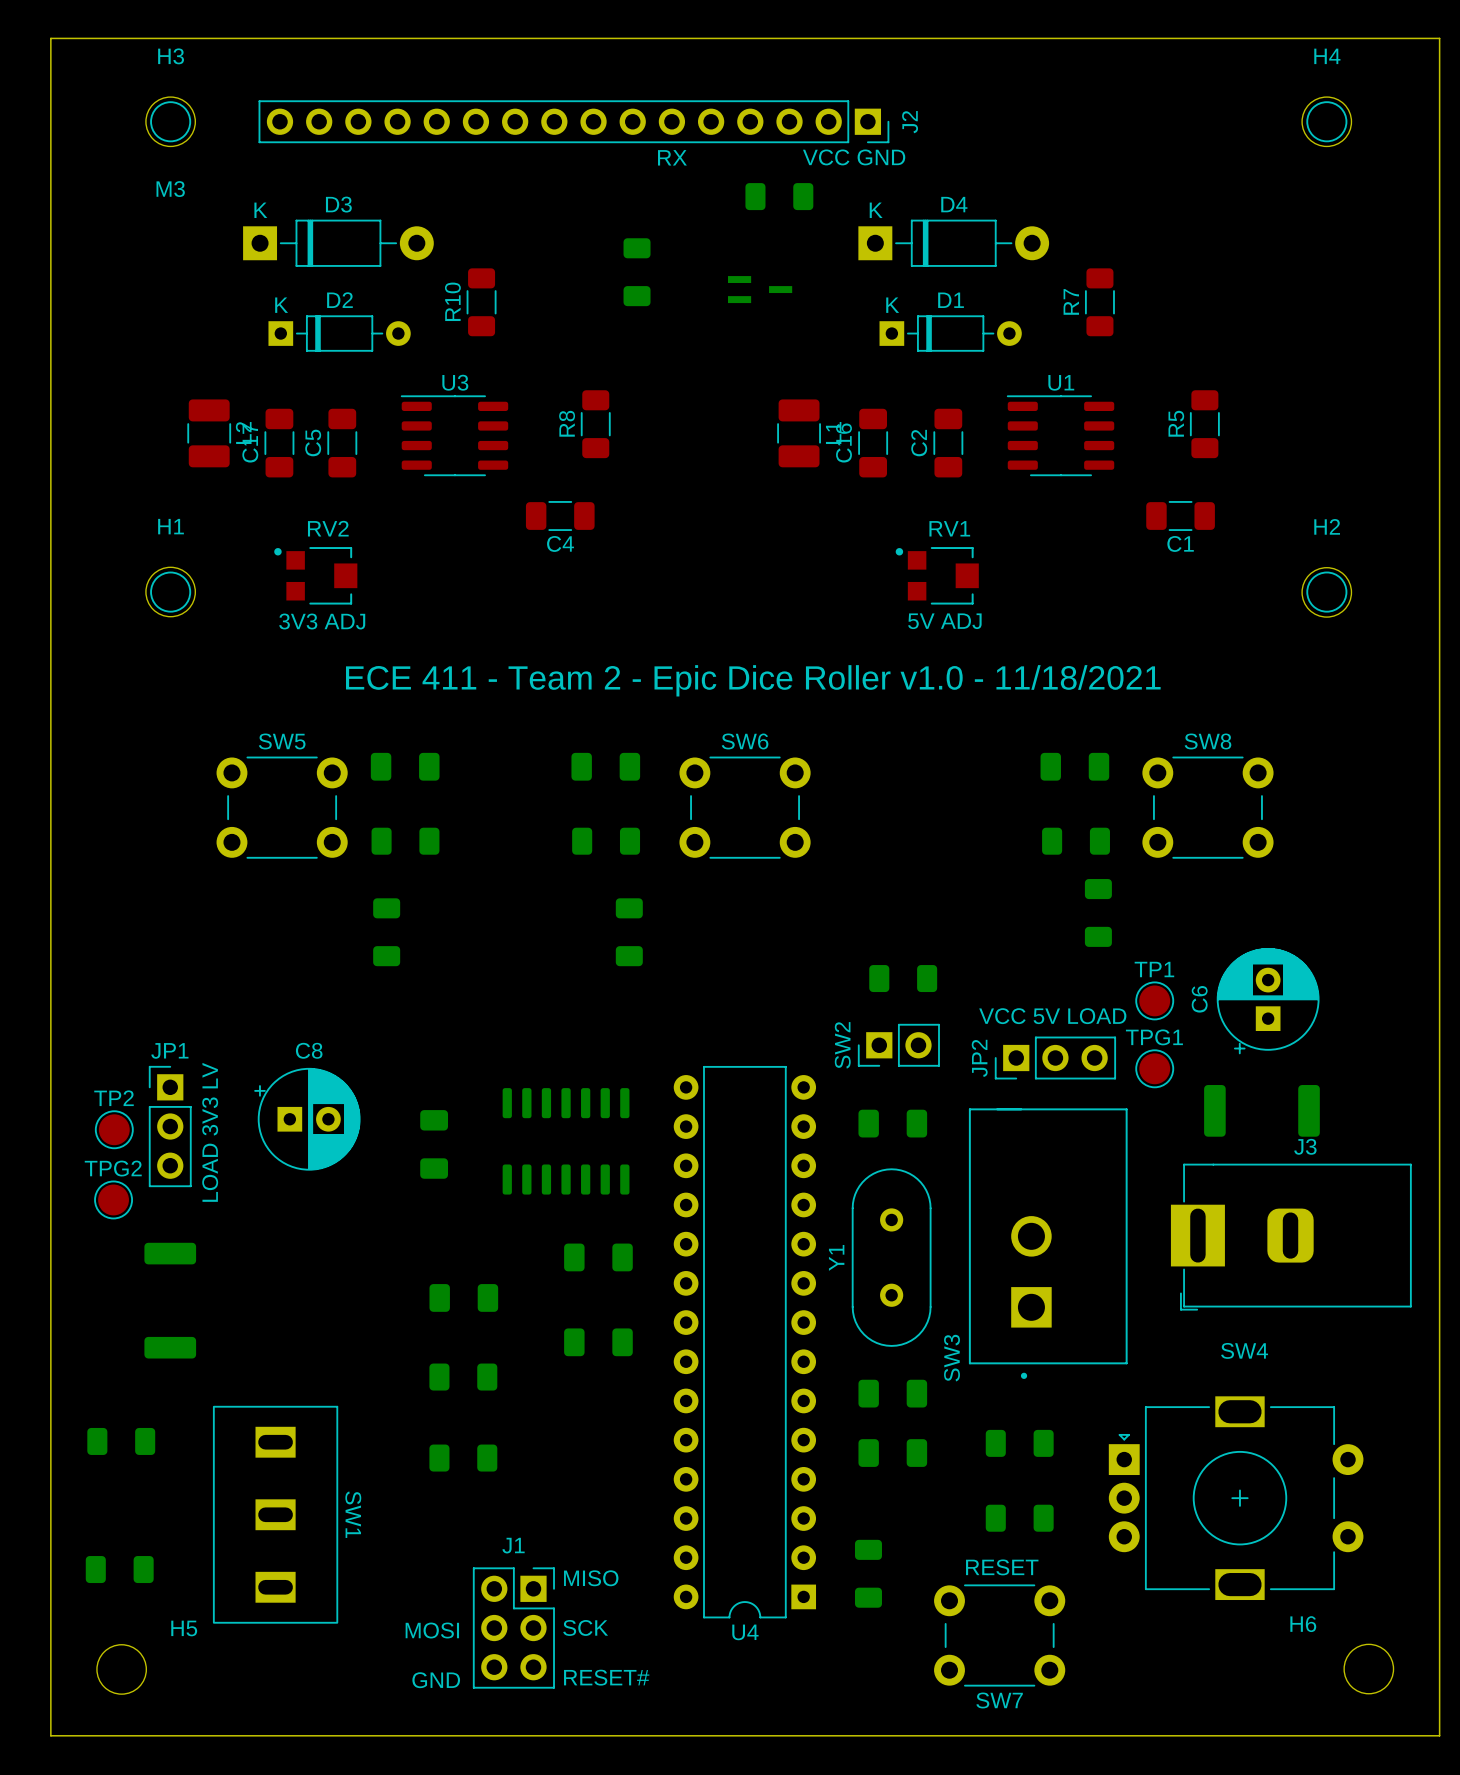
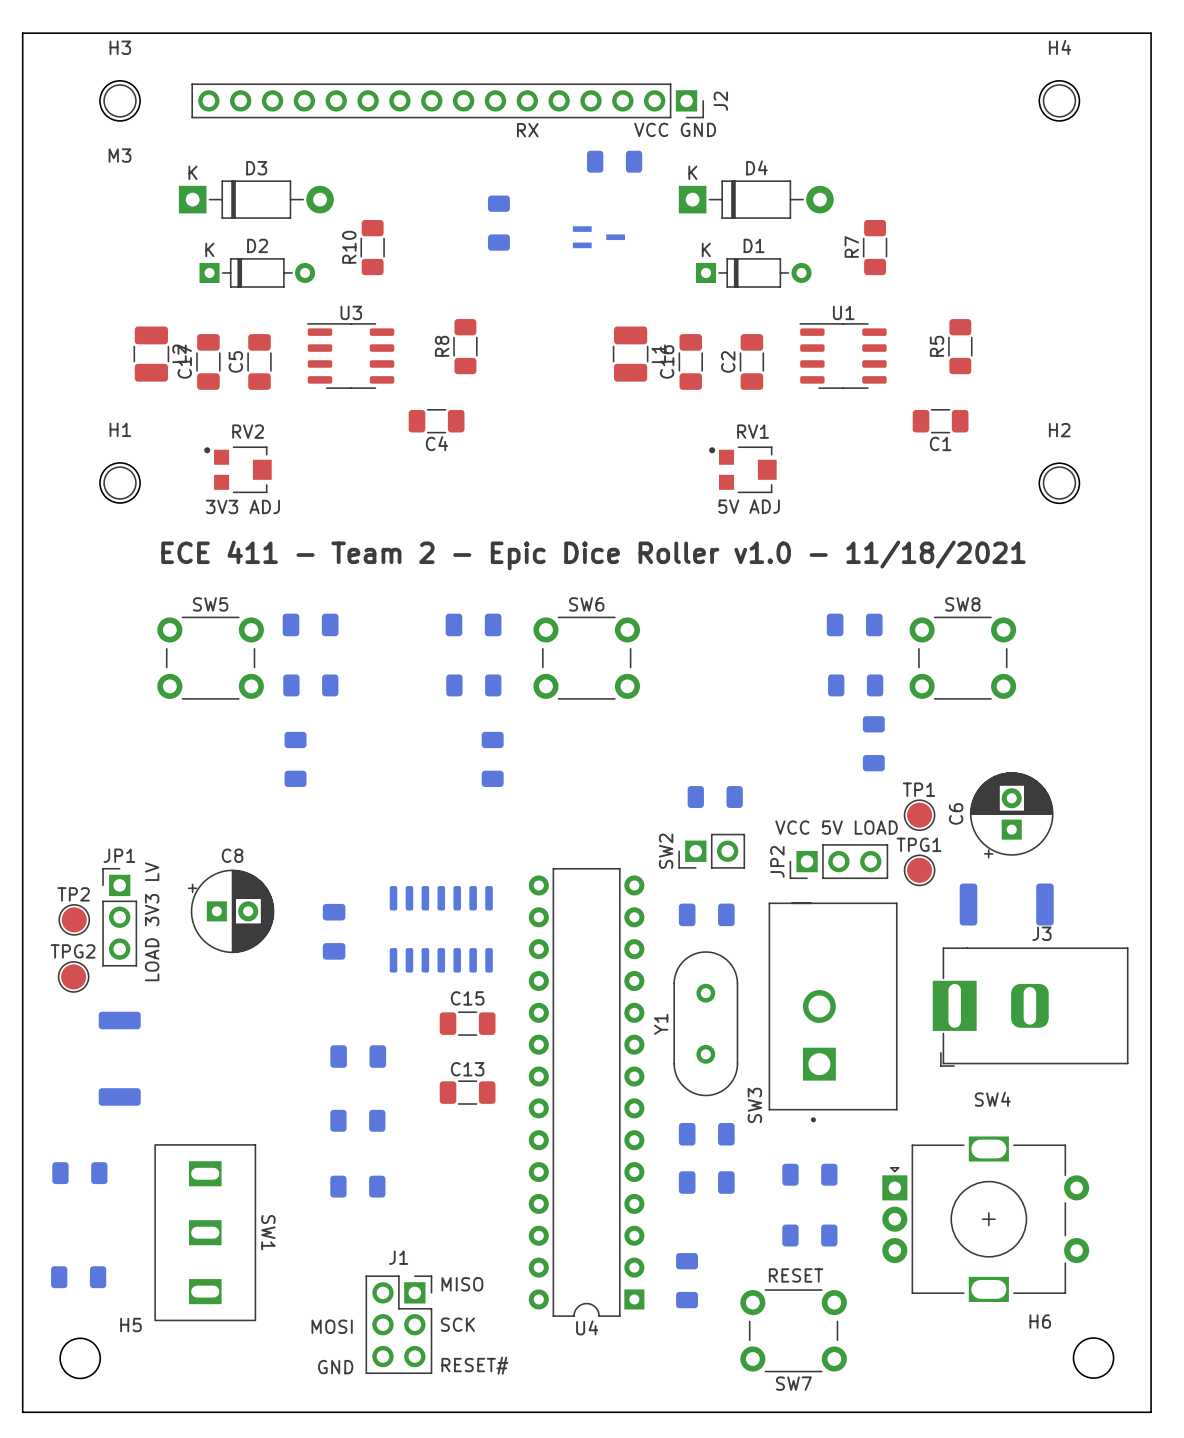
C15 side: bottom (598, 1257) -> top (467, 1023)
C13 side: bottom (598, 1342) -> top (467, 1092)

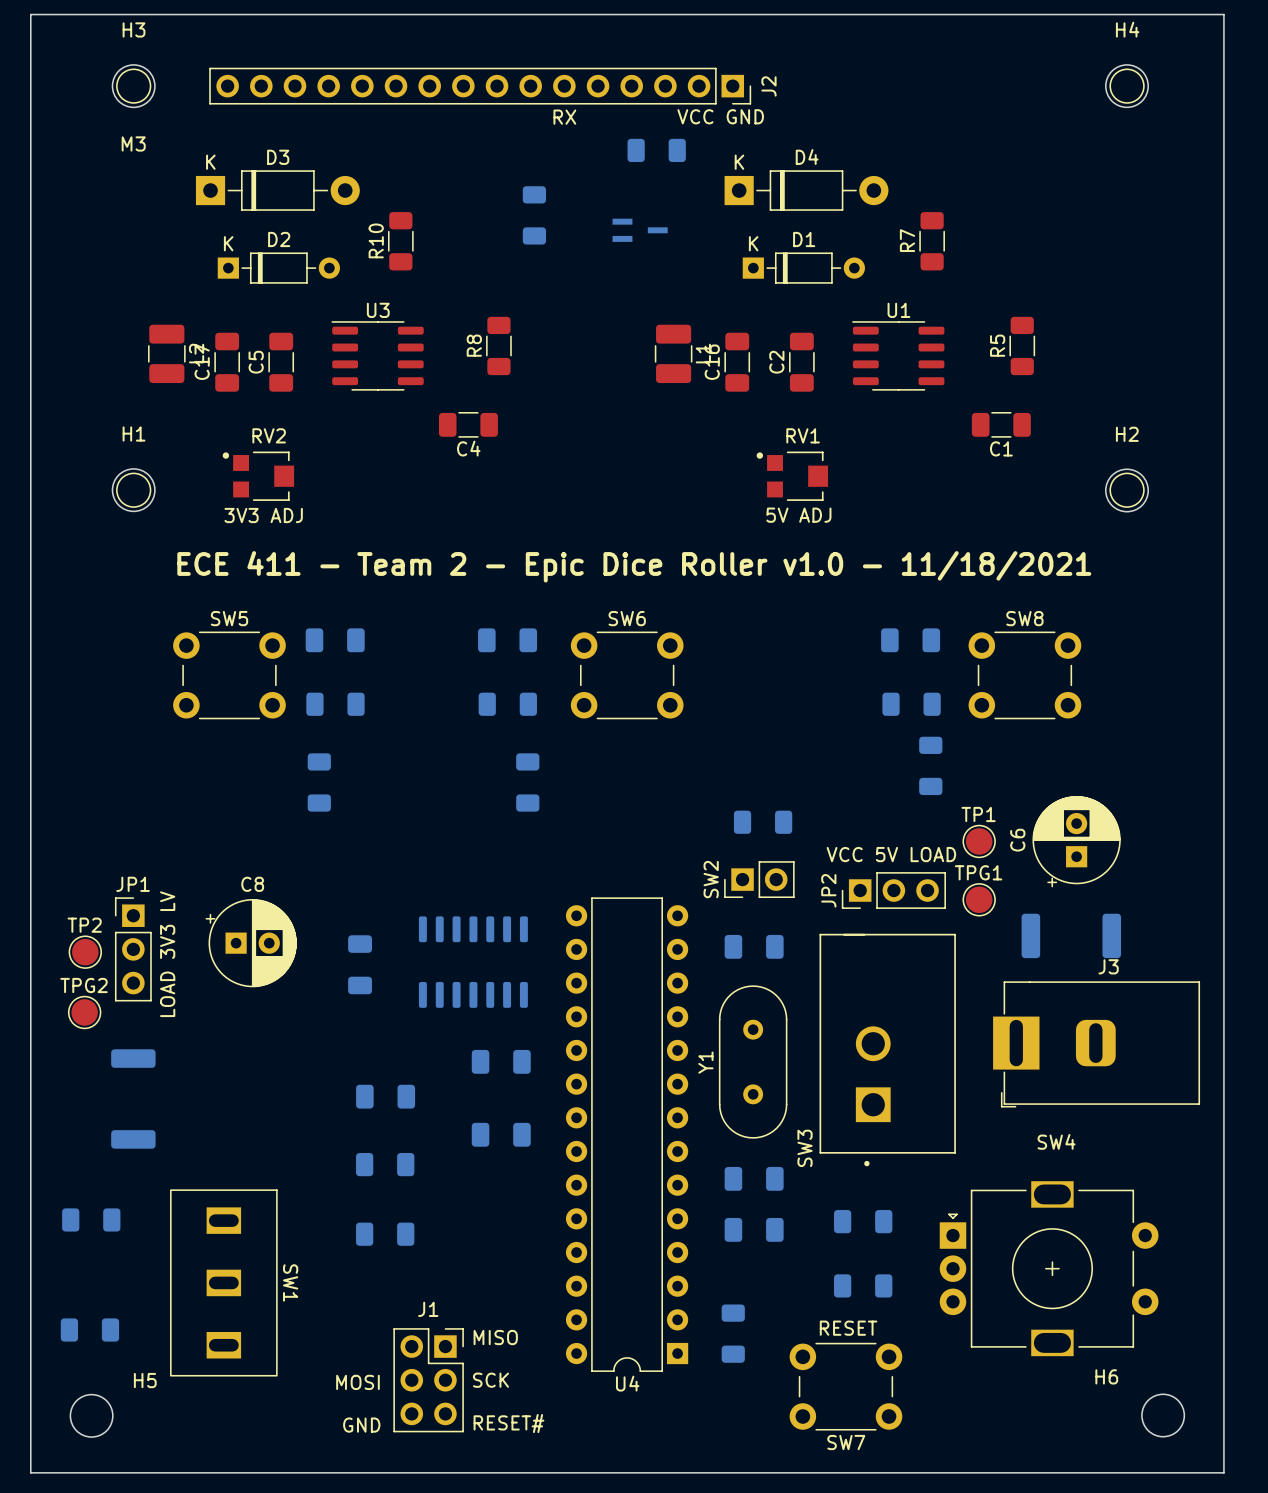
C15 side: top (467, 1023) -> bottom (501, 1061)
C13 side: top (467, 1092) -> bottom (501, 1134)

